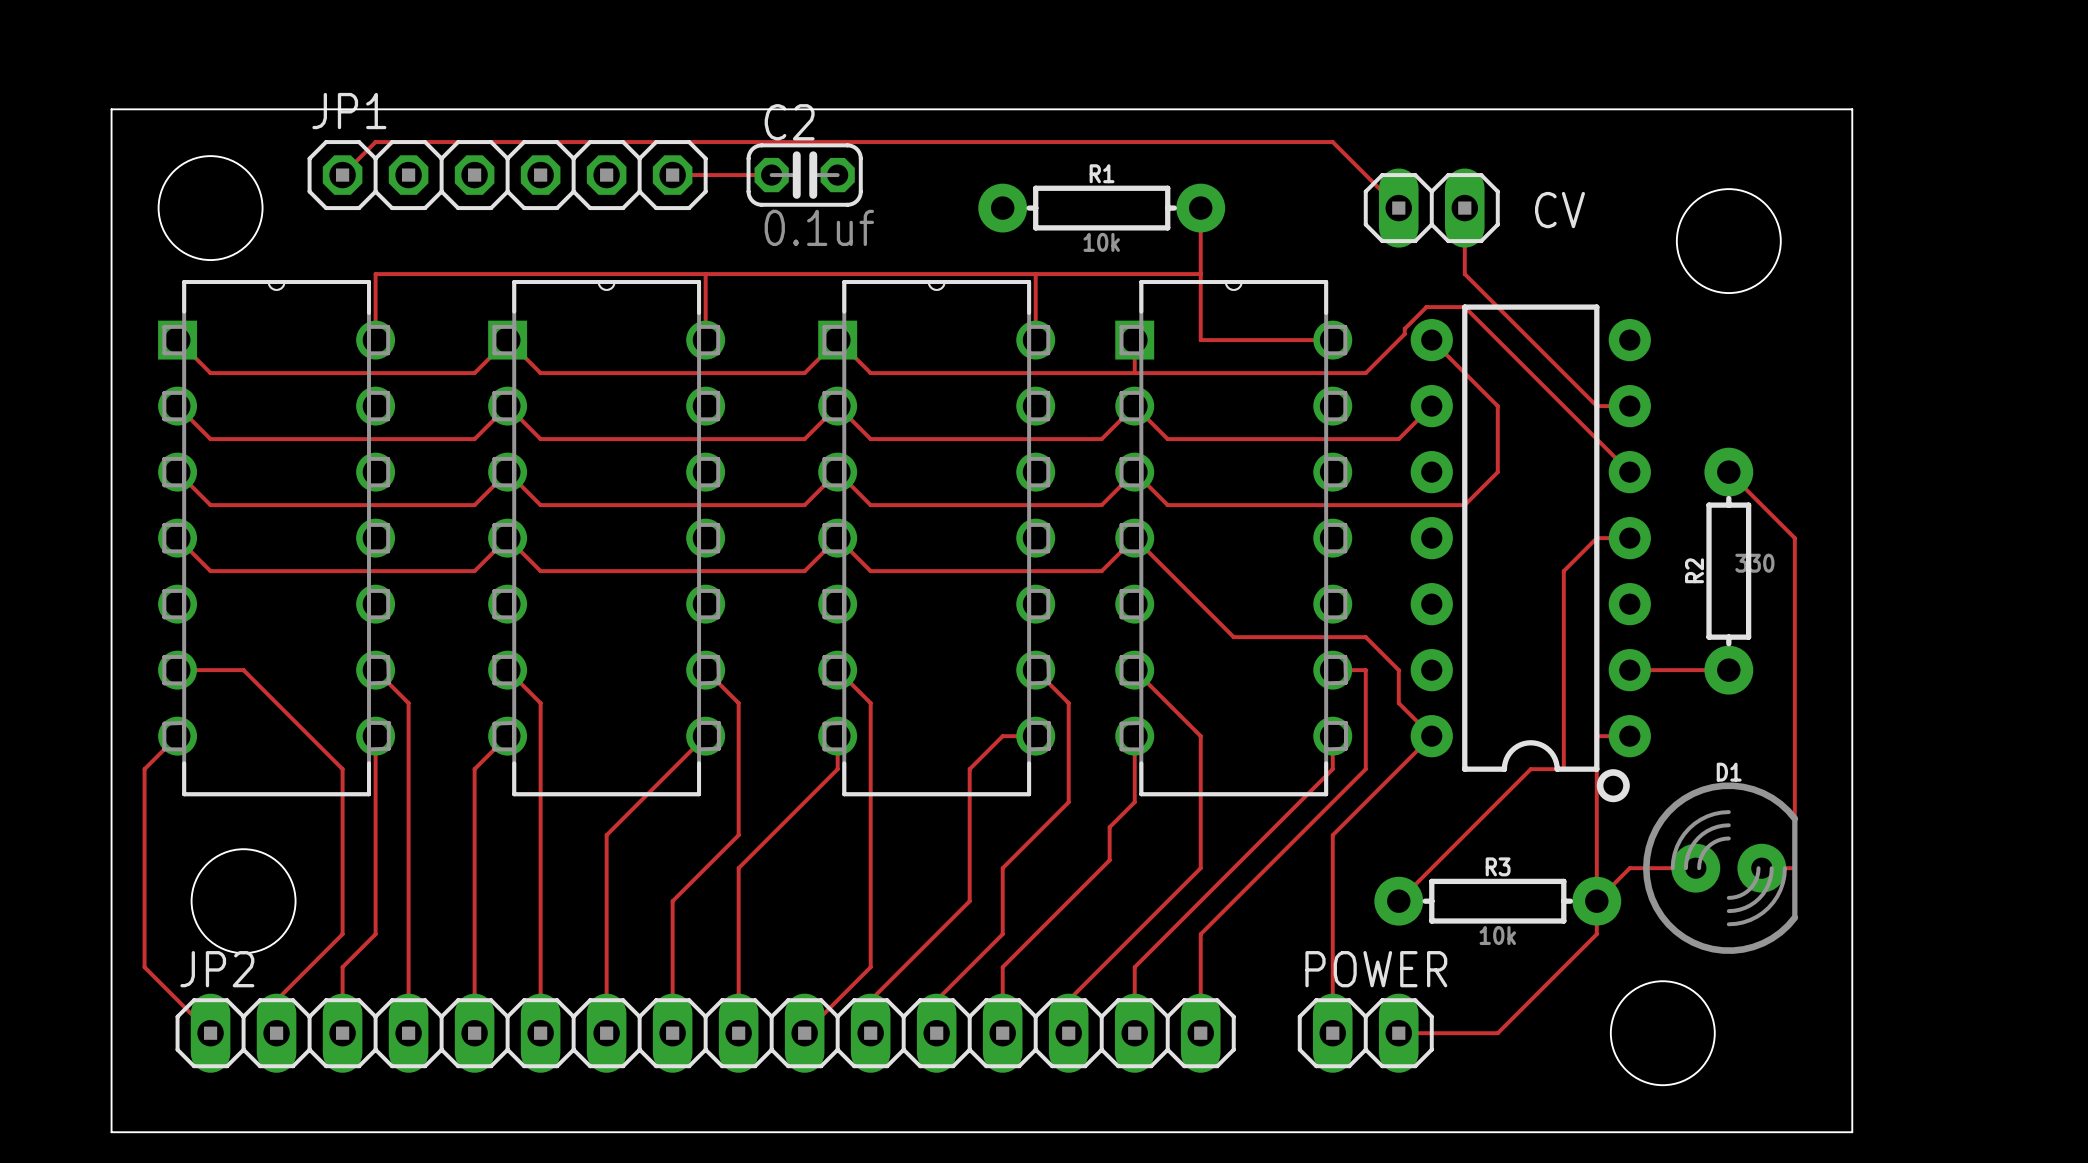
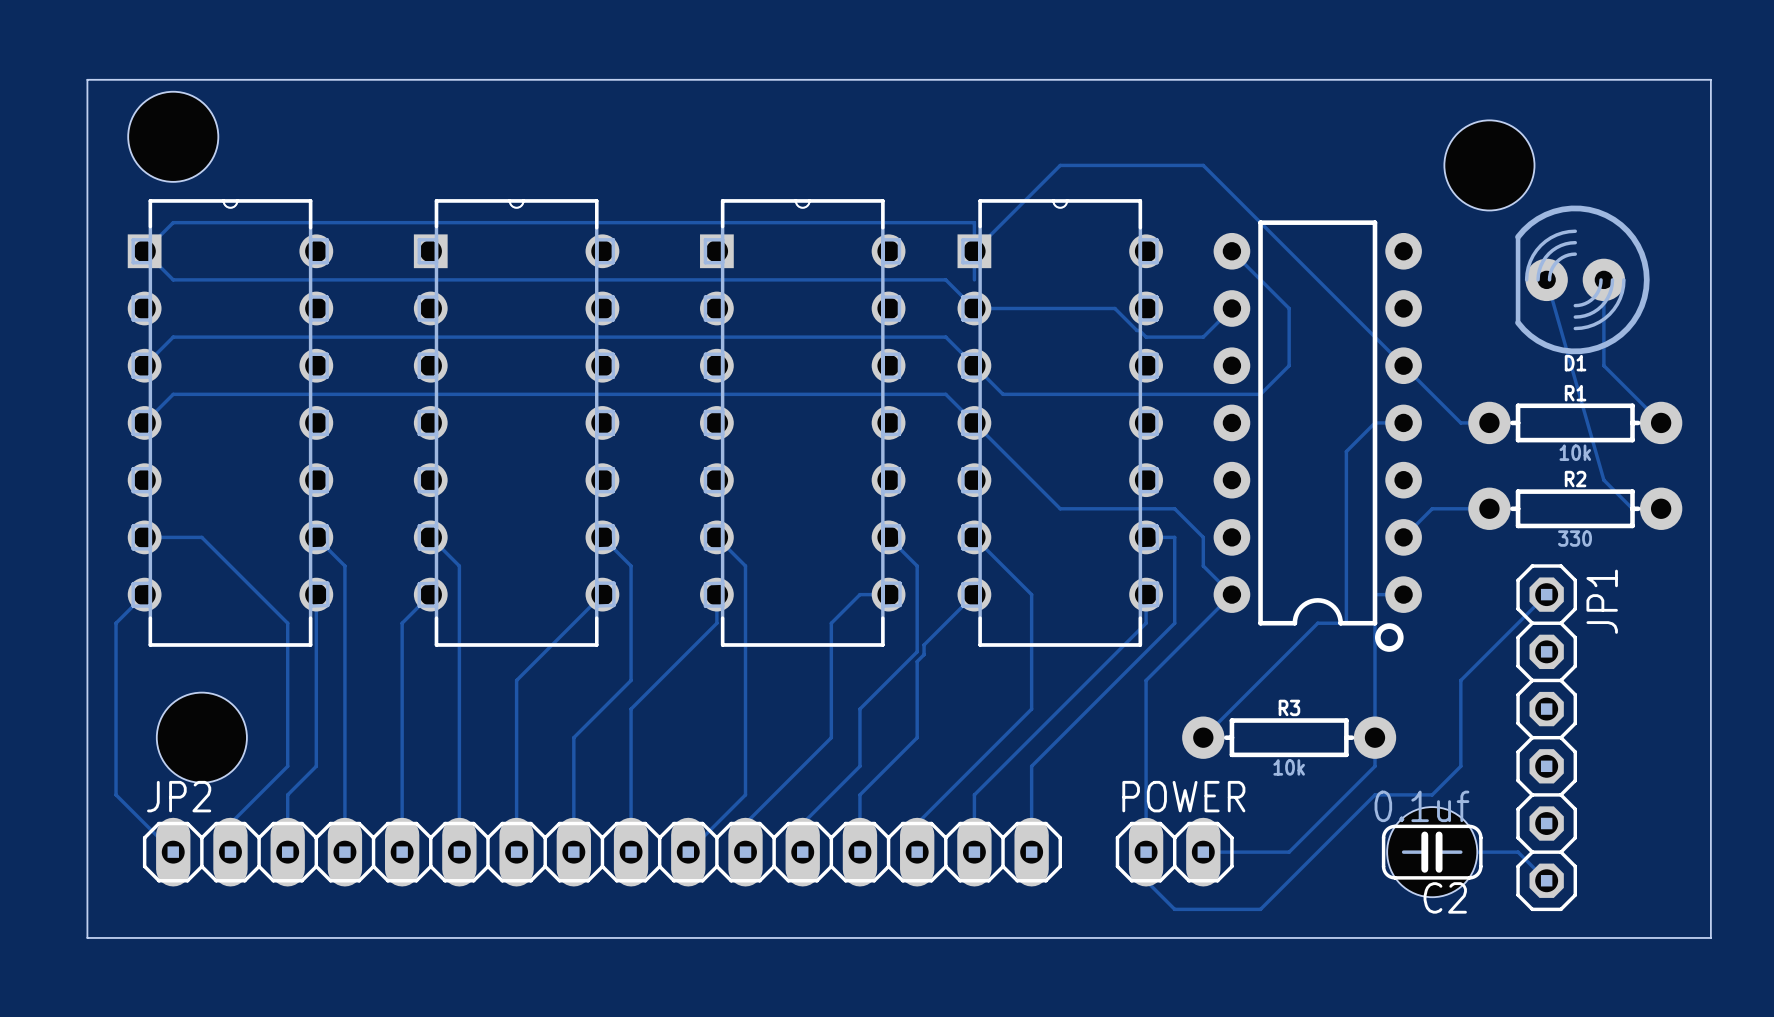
board edge: (111, 142) (111, 109) (1852, 109) (1852, 1132) -> (87, 79) (1710, 79) (1710, 937) (1596, 937)
track: (342, 175) (375, 142) (1332, 142) (1398, 208) -> none
JP1 rotation: 0° (507, 175) -> 90° clockwise (1546, 737)
JP1 position: (507, 175) -> (1546, 737)
track: (672, 175) (771, 175) -> none
C2 rotation: 0° (804, 175) -> 180° (1432, 852)
C2 position: (804, 175) -> (1432, 852)
R1 position: (1101, 208) -> (1575, 422)
track: (1200, 208) (1200, 340) (1332, 340) -> none
CV: (1431, 208) -> none
track: (1464, 208) (1464, 274) (1596, 406) (1629, 406) -> none
track: (705, 274) (705, 340) -> none
track: (1035, 274) (1035, 340) -> none
track: (1200, 274) (375, 274) (375, 340) -> none
track: (1464, 307) (1426, 307) (1404, 328) (1404, 334) (1365, 373) (1101, 373) -> (1260, 222) (1203, 165) (1060, 165) (974, 251) (974, 222) (173, 222) (144, 251)
track: (474, 373) (507, 340) (540, 373) -> (402, 279) (459, 279)
track: (804, 373) (837, 340) (870, 373) -> (688, 279) (745, 279)
track: none -> (1546, 279) (1603, 480) (1632, 508) (1661, 508)
track: none -> (1603, 279) (1603, 365) (1661, 422)
track: (177, 406) (210, 439) -> (144, 365) (173, 337)
track: (474, 439) (507, 406) (540, 439) -> (402, 337) (459, 337)
track: (804, 439) (837, 406) (870, 439) -> (688, 337) (745, 337)
track: (1101, 439) (1134, 406) (1167, 439) (1332, 439) -> (945, 279) (974, 308) (1114, 308) (1146, 337)
track: none -> (945, 337) (974, 365)
track: (177, 472) (210, 505) -> (144, 422) (173, 394)
track: (1134, 472) (1101, 505) -> (974, 422) (945, 394)
track: none -> (1403, 365) (1460, 422) (1489, 422)
track: (1728, 472) (1794, 538) (1794, 868) (1761, 868) -> none
track: (474, 505) (507, 472) (540, 505) -> (402, 394) (459, 394)
track: (804, 505) (837, 472) (870, 505) -> (688, 394) (745, 394)
track: (177, 538) (210, 571) (474, 571) (507, 538) (540, 571) (804, 571) (837, 538) (870, 571) (1101, 571) (1134, 538) -> none
R2 rotation: 0° (1728, 571) -> 90° clockwise (1575, 508)
track: (1629, 670) (1728, 670) -> (1403, 537) (1432, 508) (1489, 508)
track: (1134, 736) (1134, 802) (1109, 827) (1109, 860) (1068, 901) -> (974, 594) (924, 644) (924, 654) (917, 661) (917, 737)
track: none -> (1546, 594) (1460, 680) (1460, 766) (1432, 794) (1374, 794) (1260, 909) (1174, 909) (1146, 880)
track: (1695, 868) (1629, 868) (1596, 901) -> none
D1 rotation: 0° (1720, 868) -> 180° (1582, 279)
D1 position: (1720, 868) -> (1582, 279)
track: none -> (1460, 852) (1518, 852) (1546, 880)

